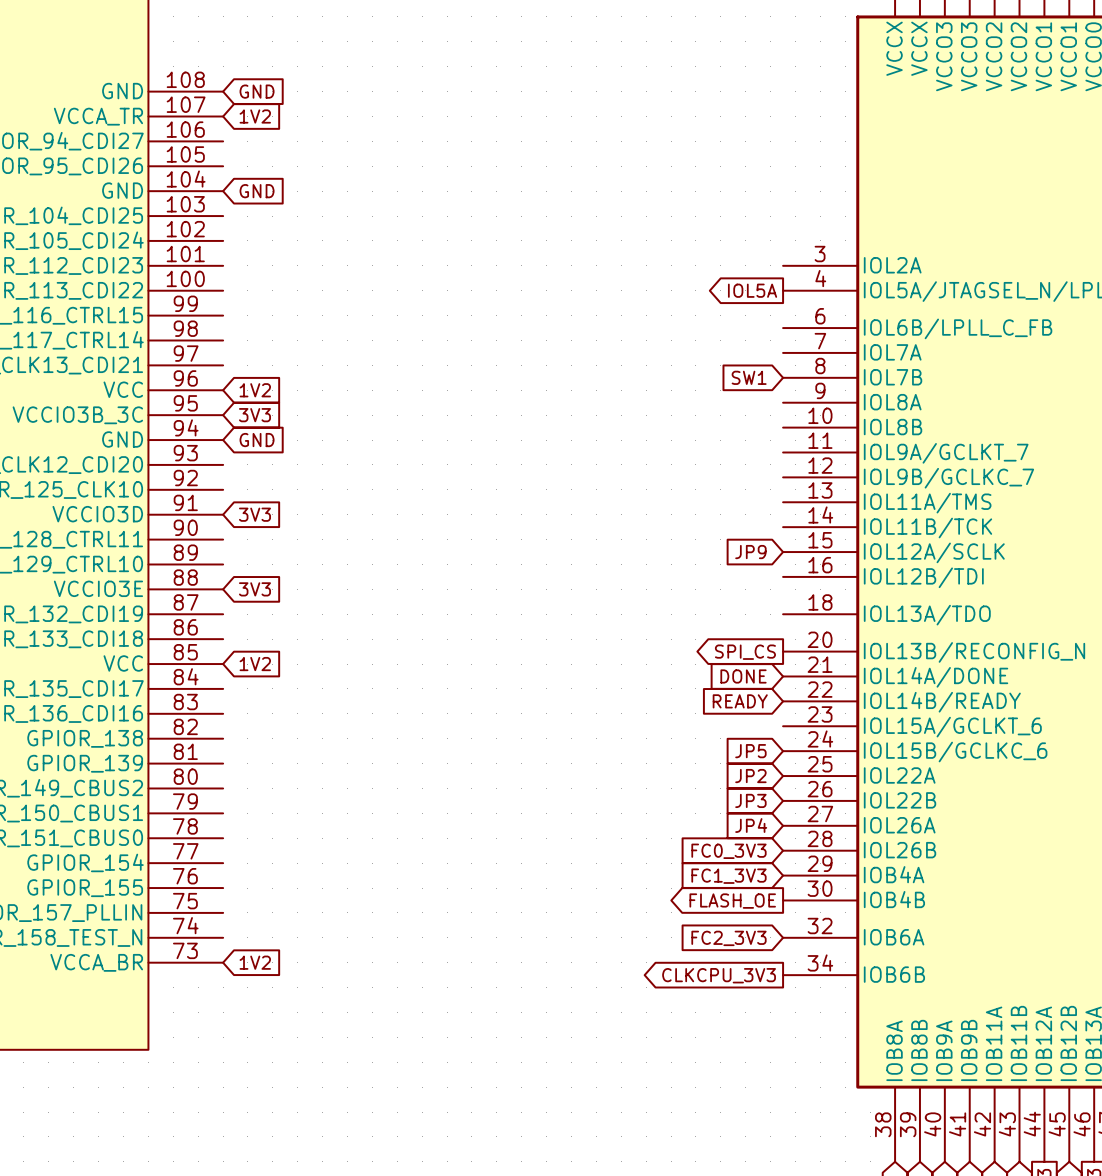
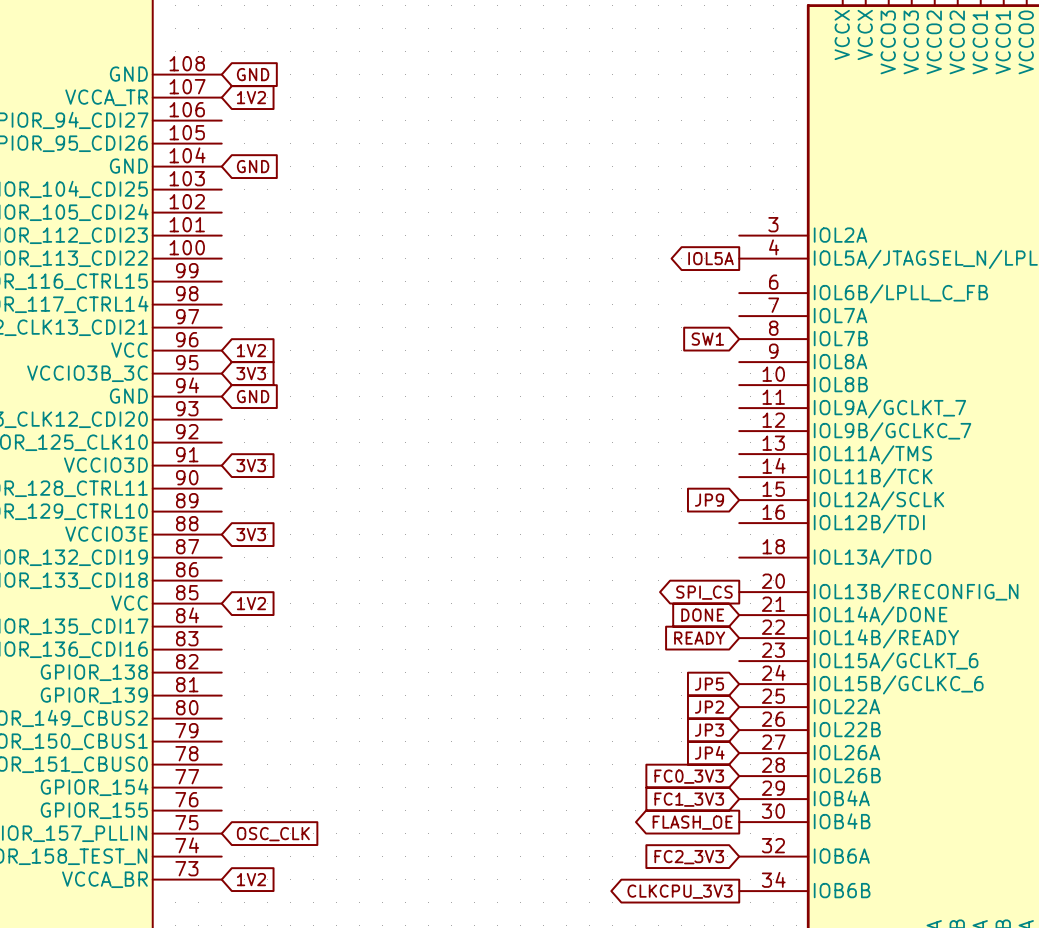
global label: none -> OSC_CLK (273, 834)

